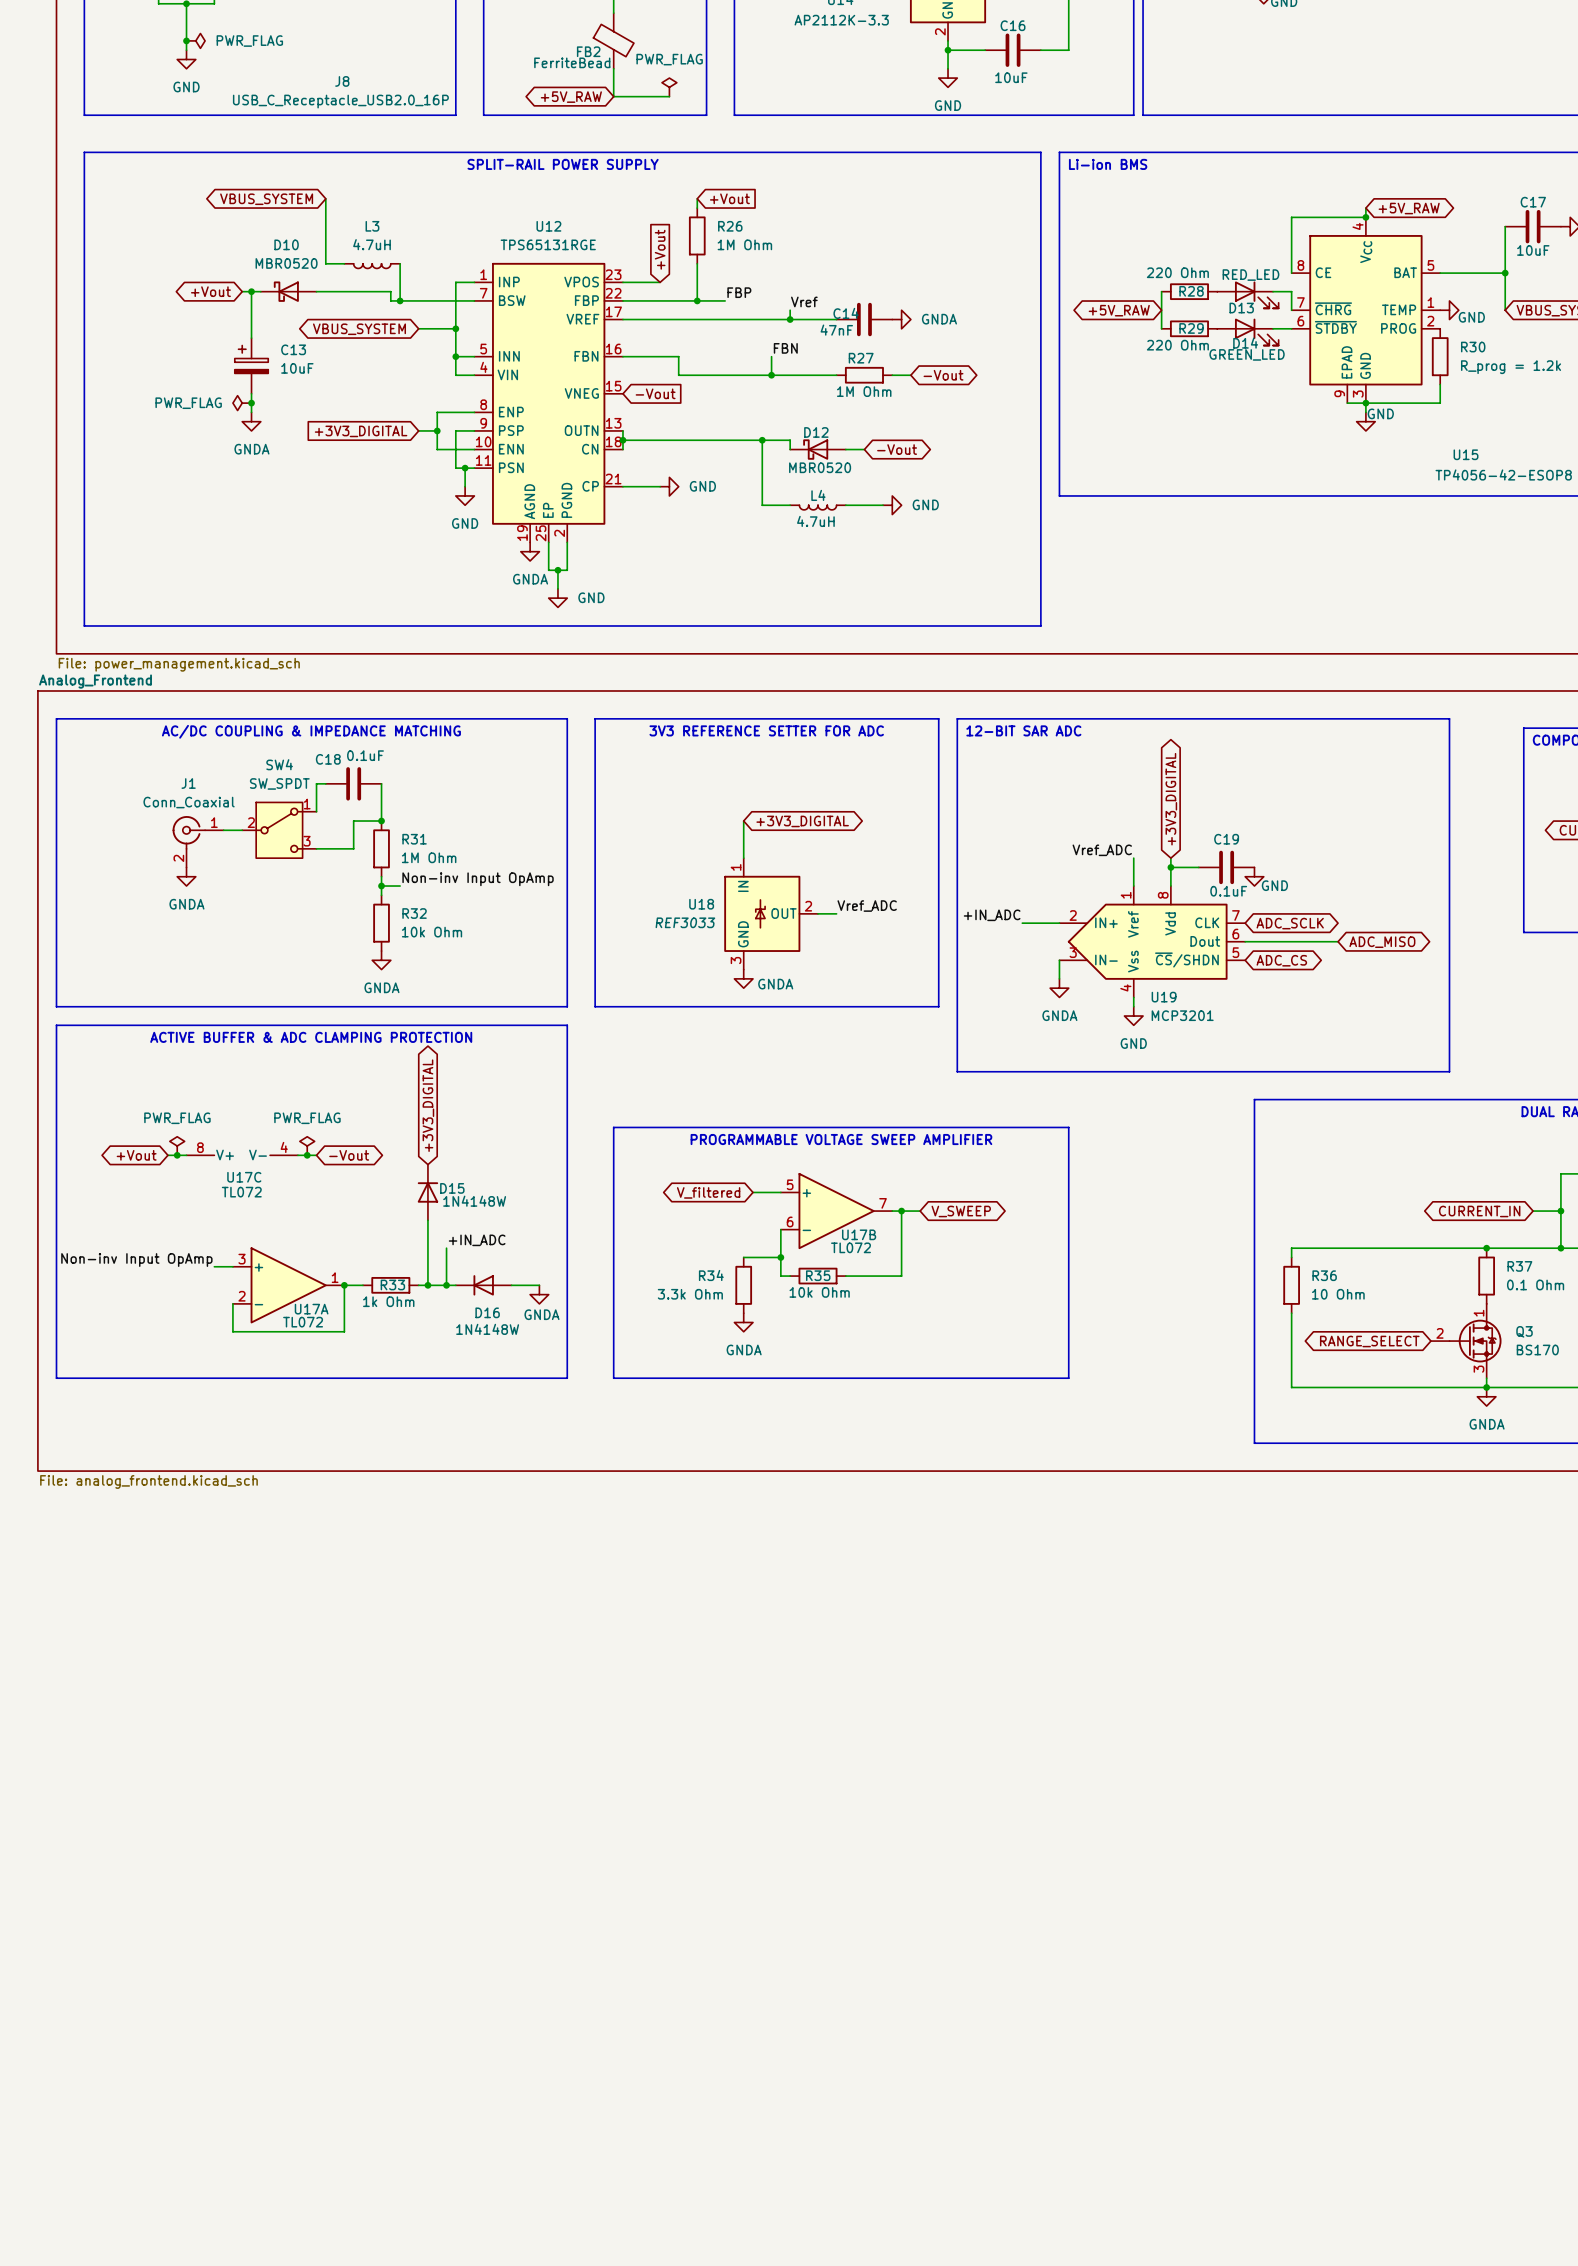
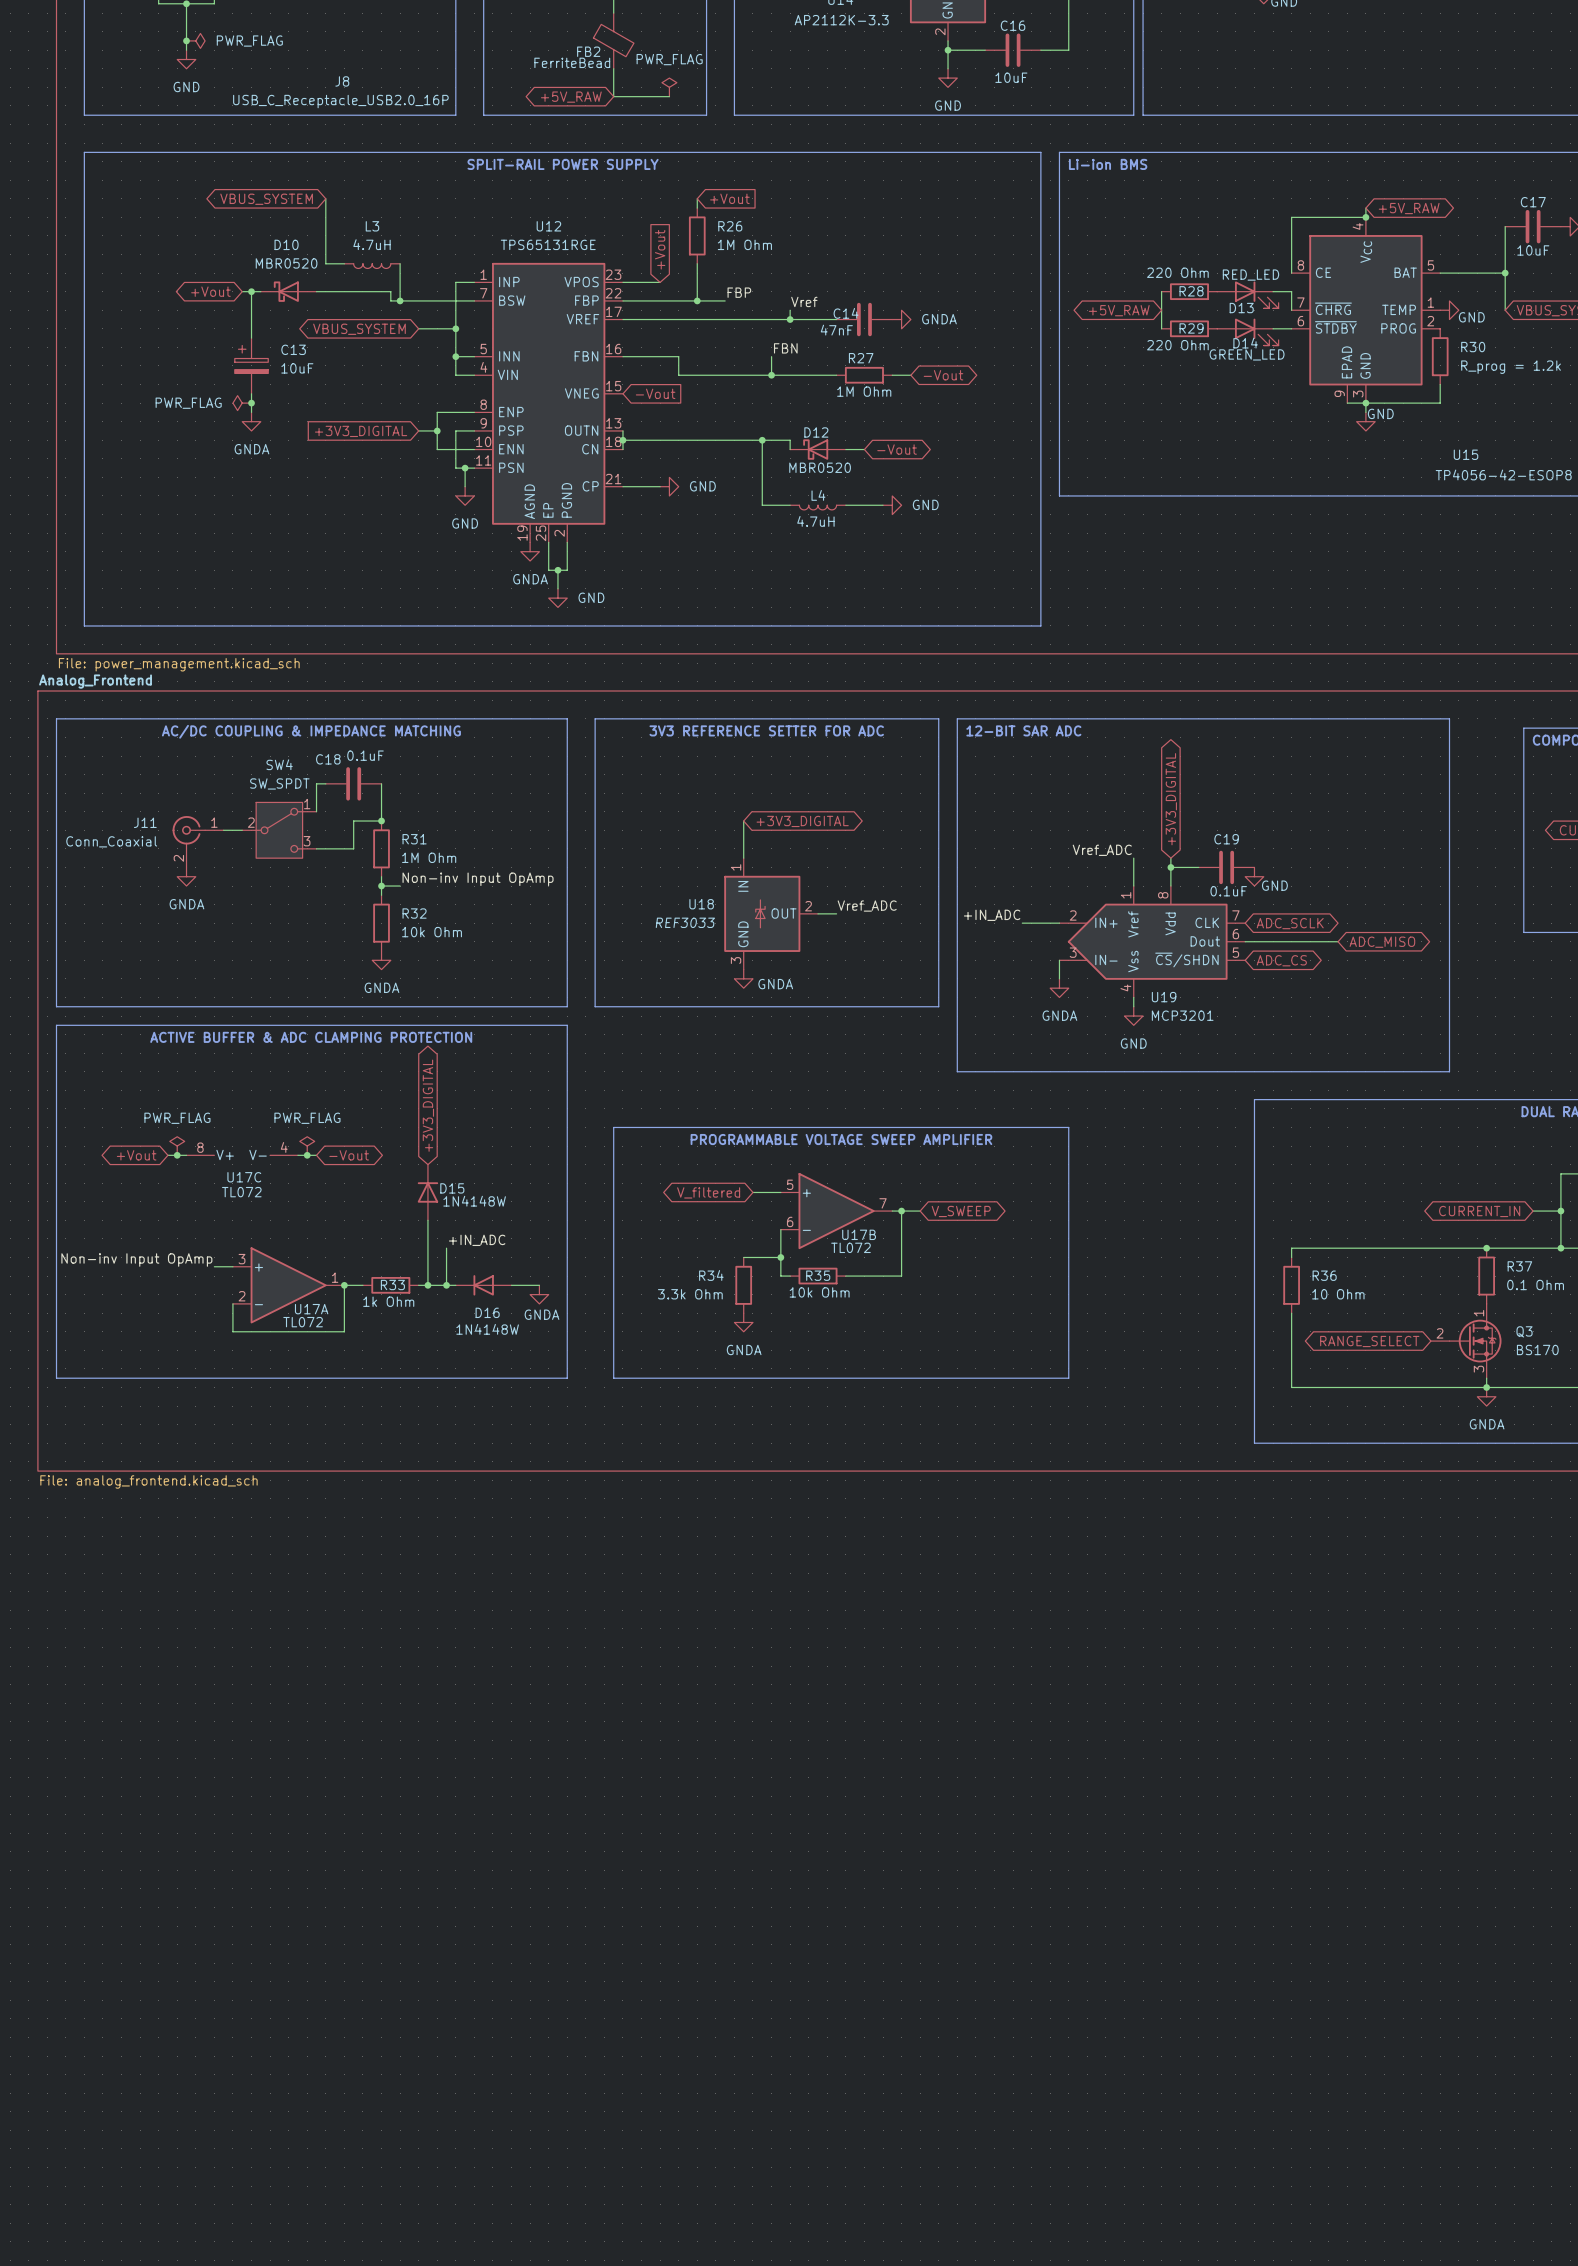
J1 name: J1 (188, 783) -> J11 (145, 822)
J1 value position: Conn_Coaxial (189, 802) -> Conn_Coaxial (111, 841)

